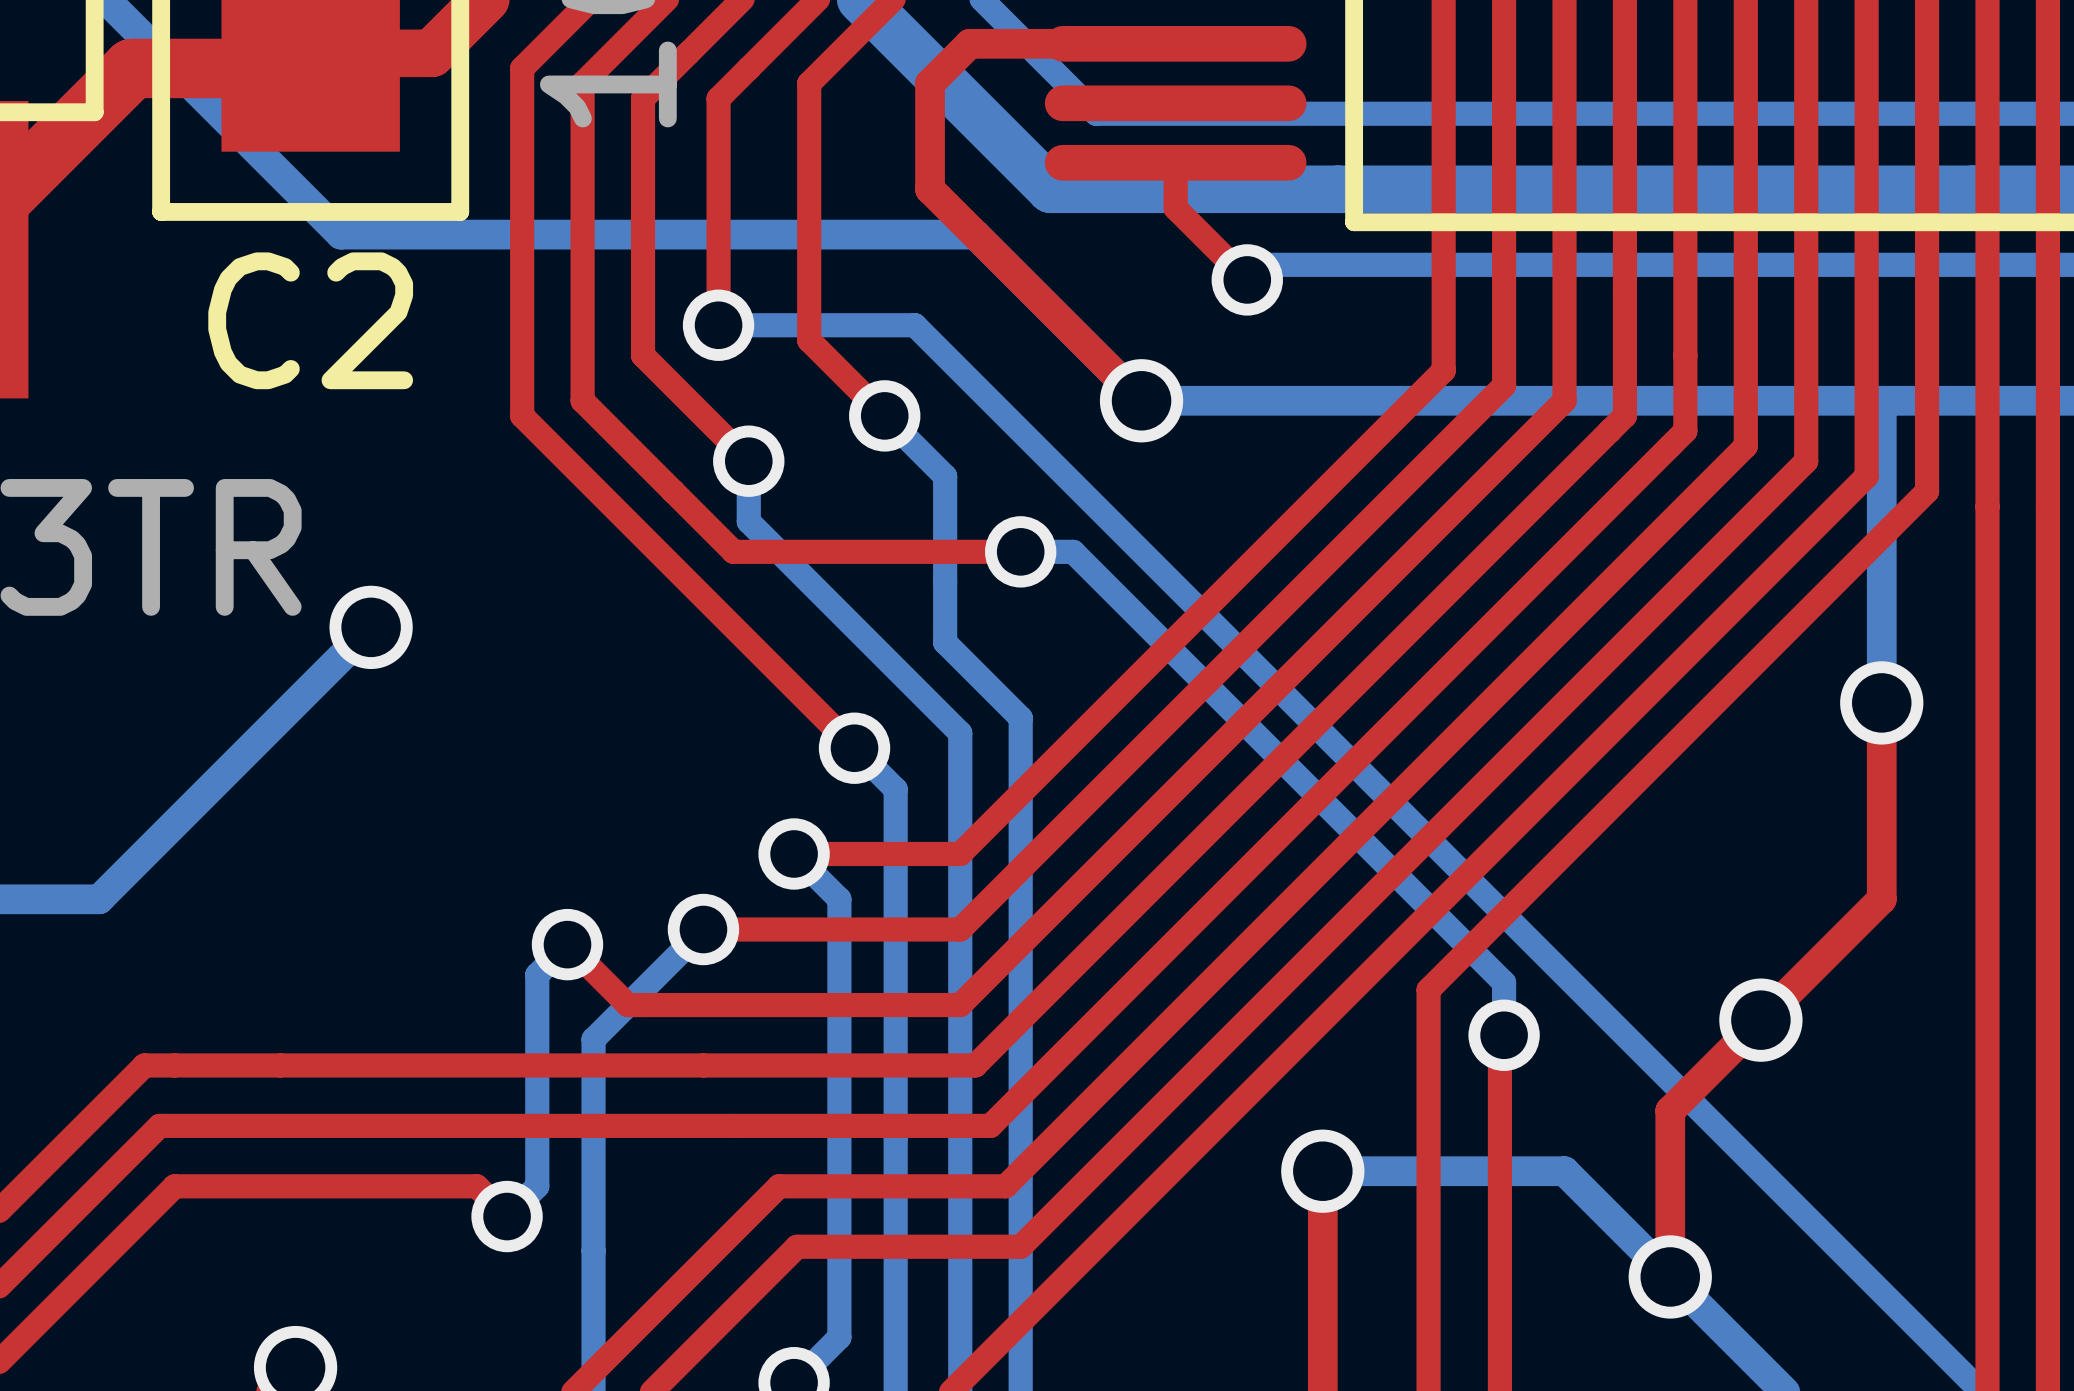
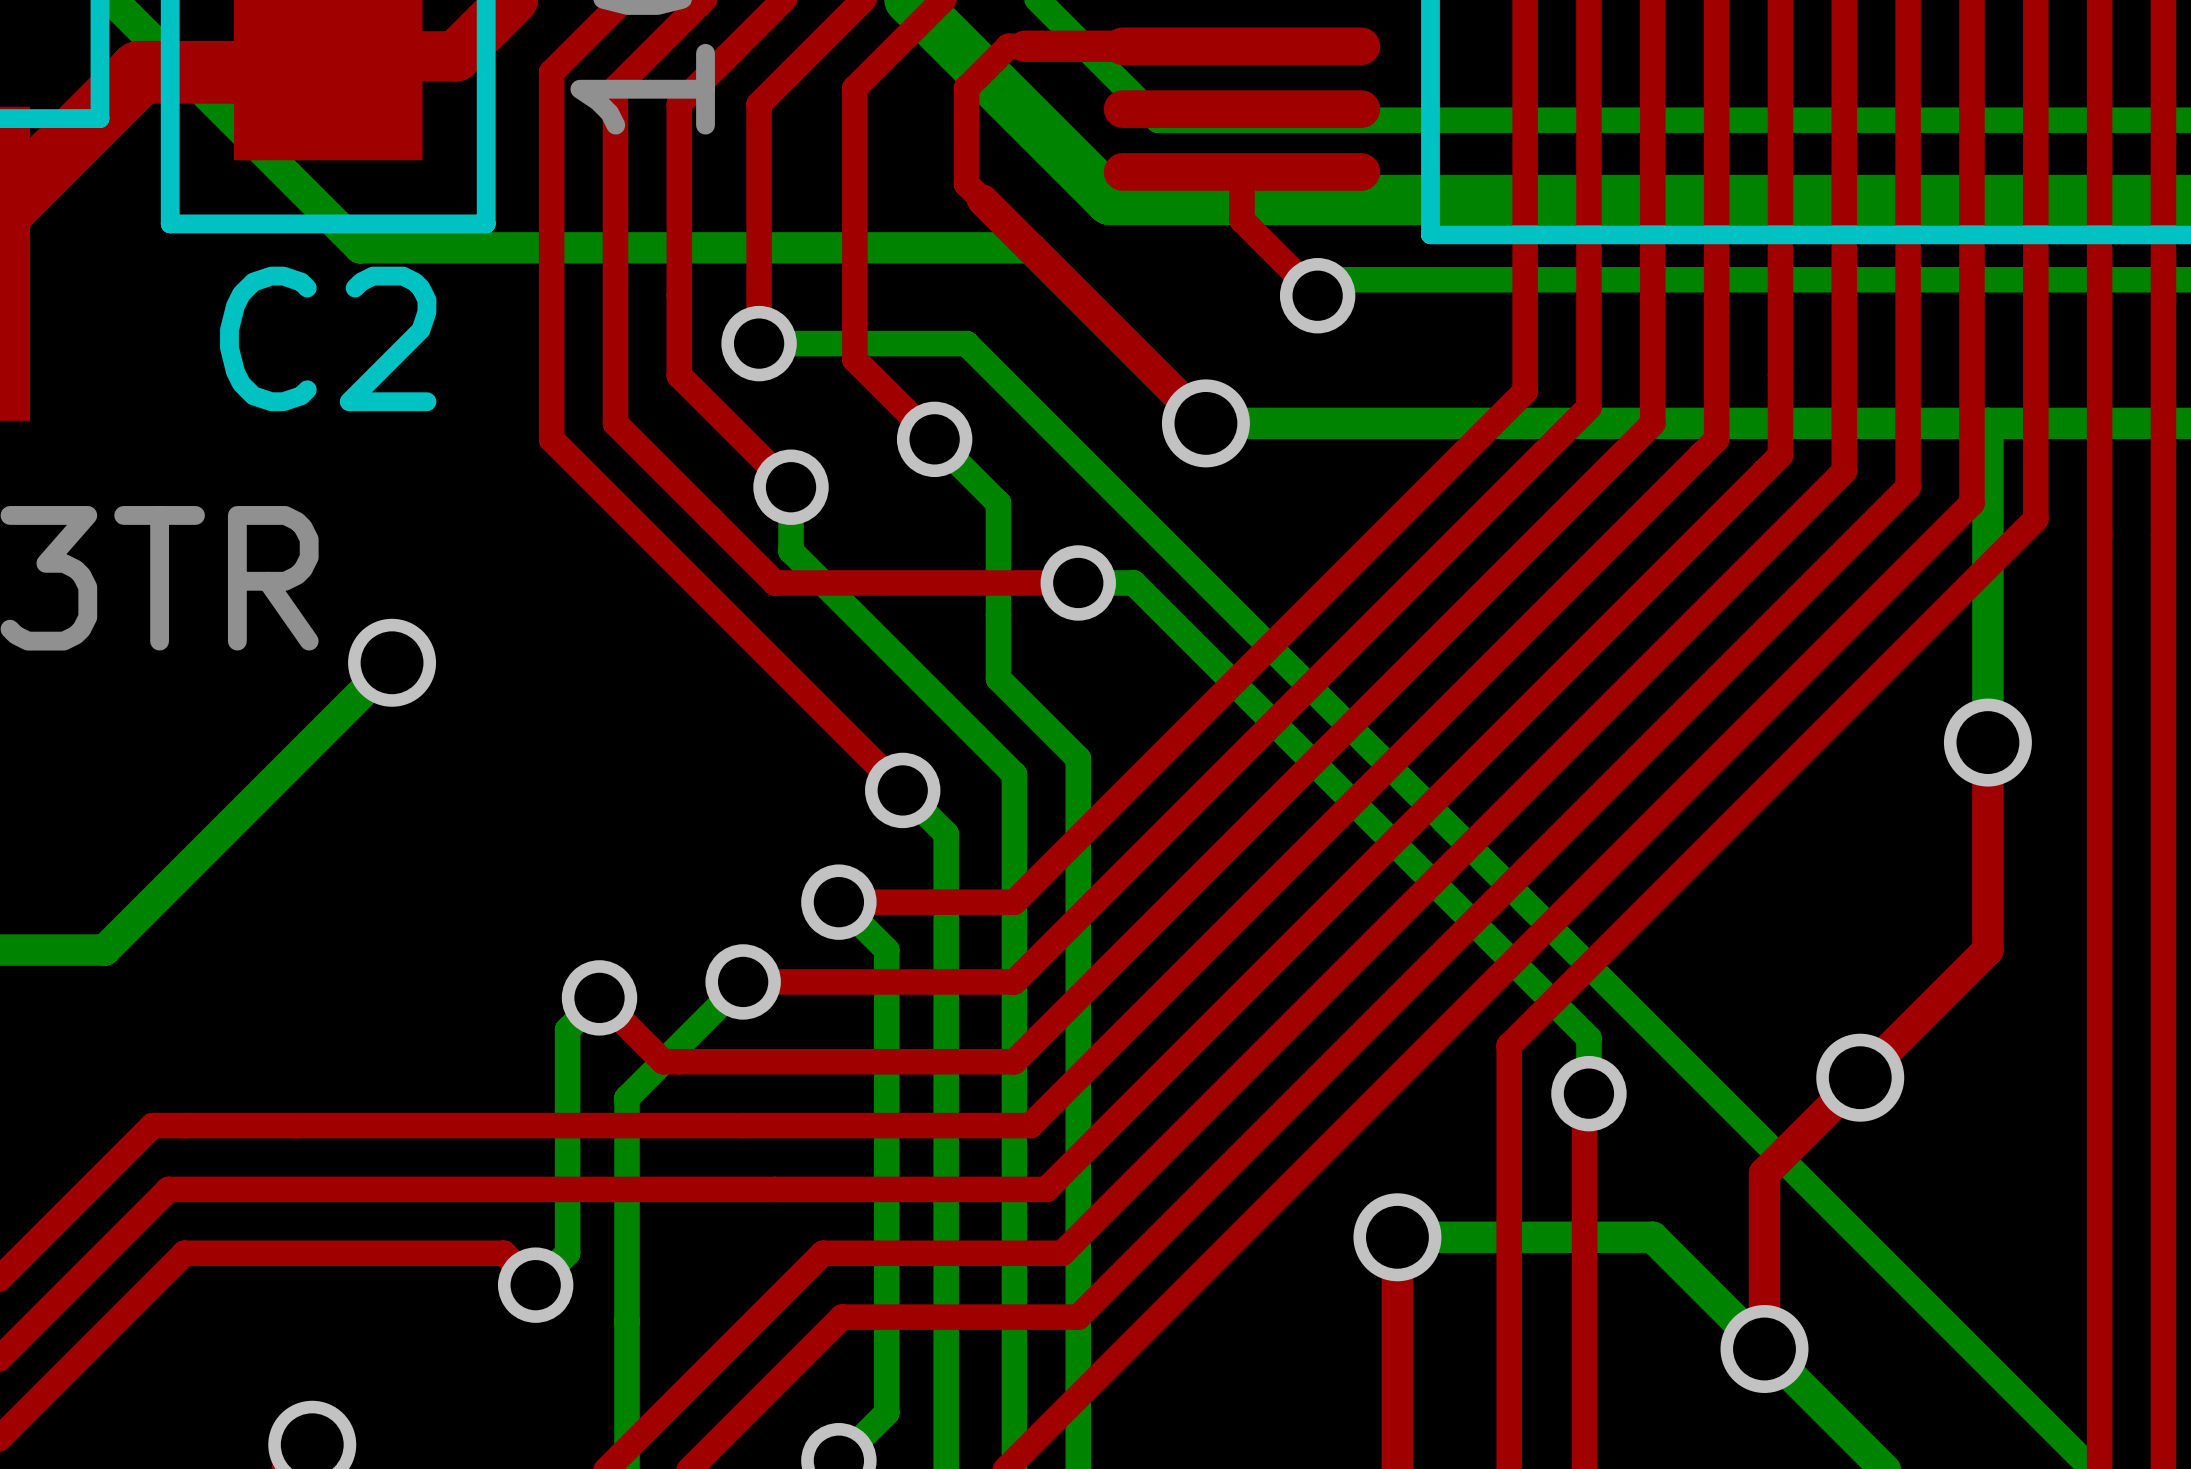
top track: (969, 43) (930, 83) (930, 189) -> (1024, 46) (1008, 46) (966, 88) (966, 184) (982, 199)

